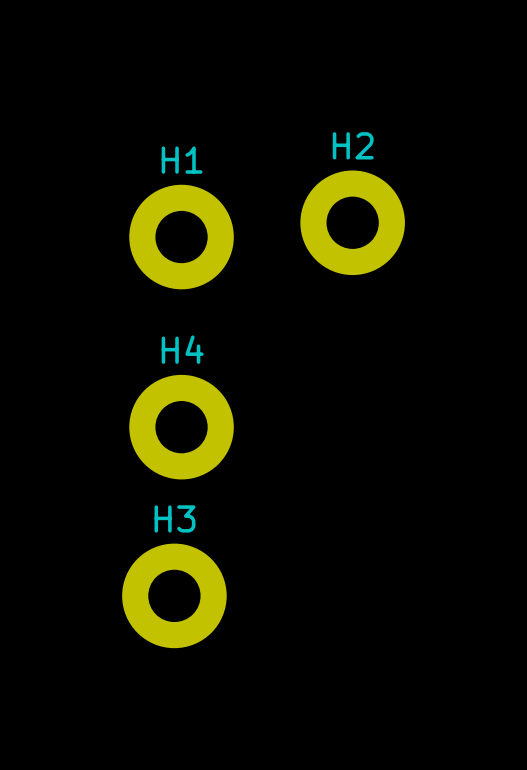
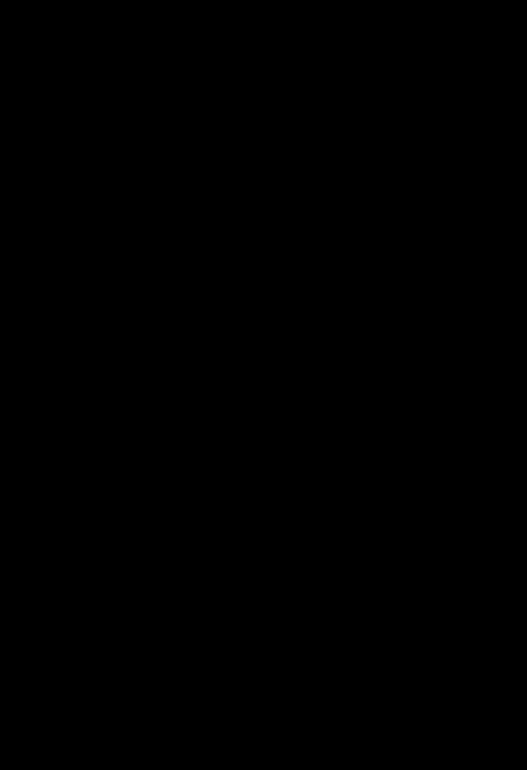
H2: (352, 222) -> none
H1: (181, 237) -> none
H4: (181, 427) -> none
H3: (174, 595) -> none

